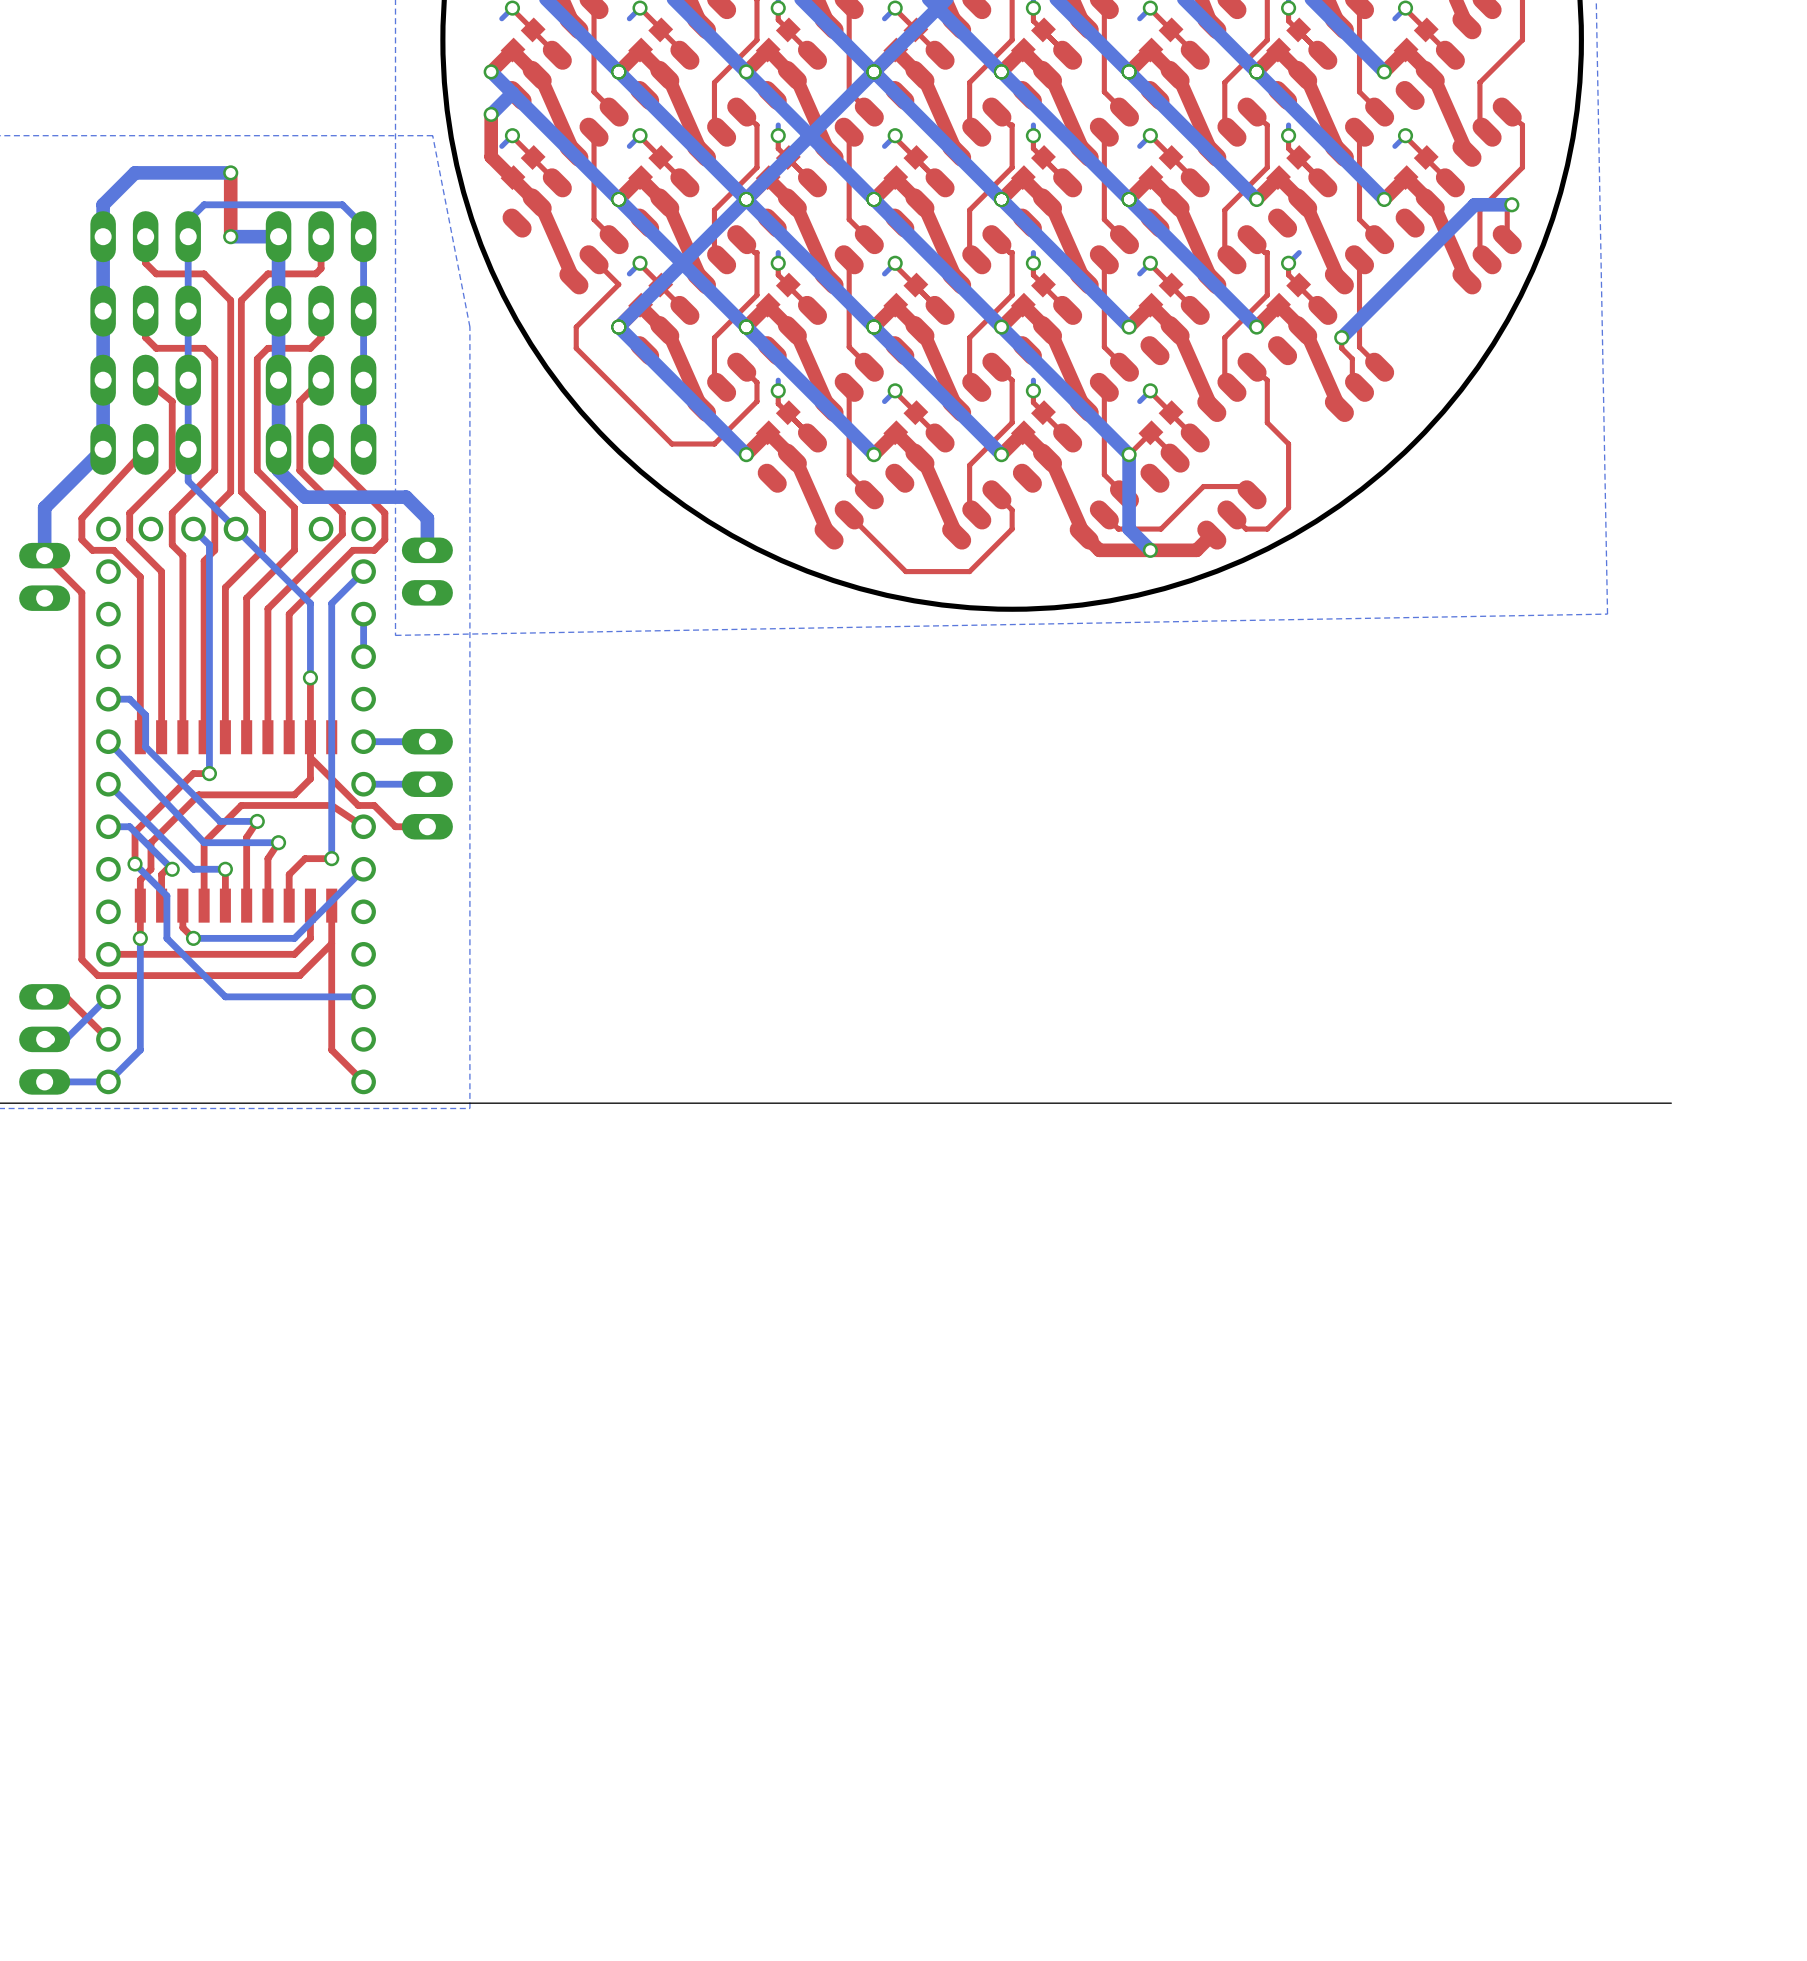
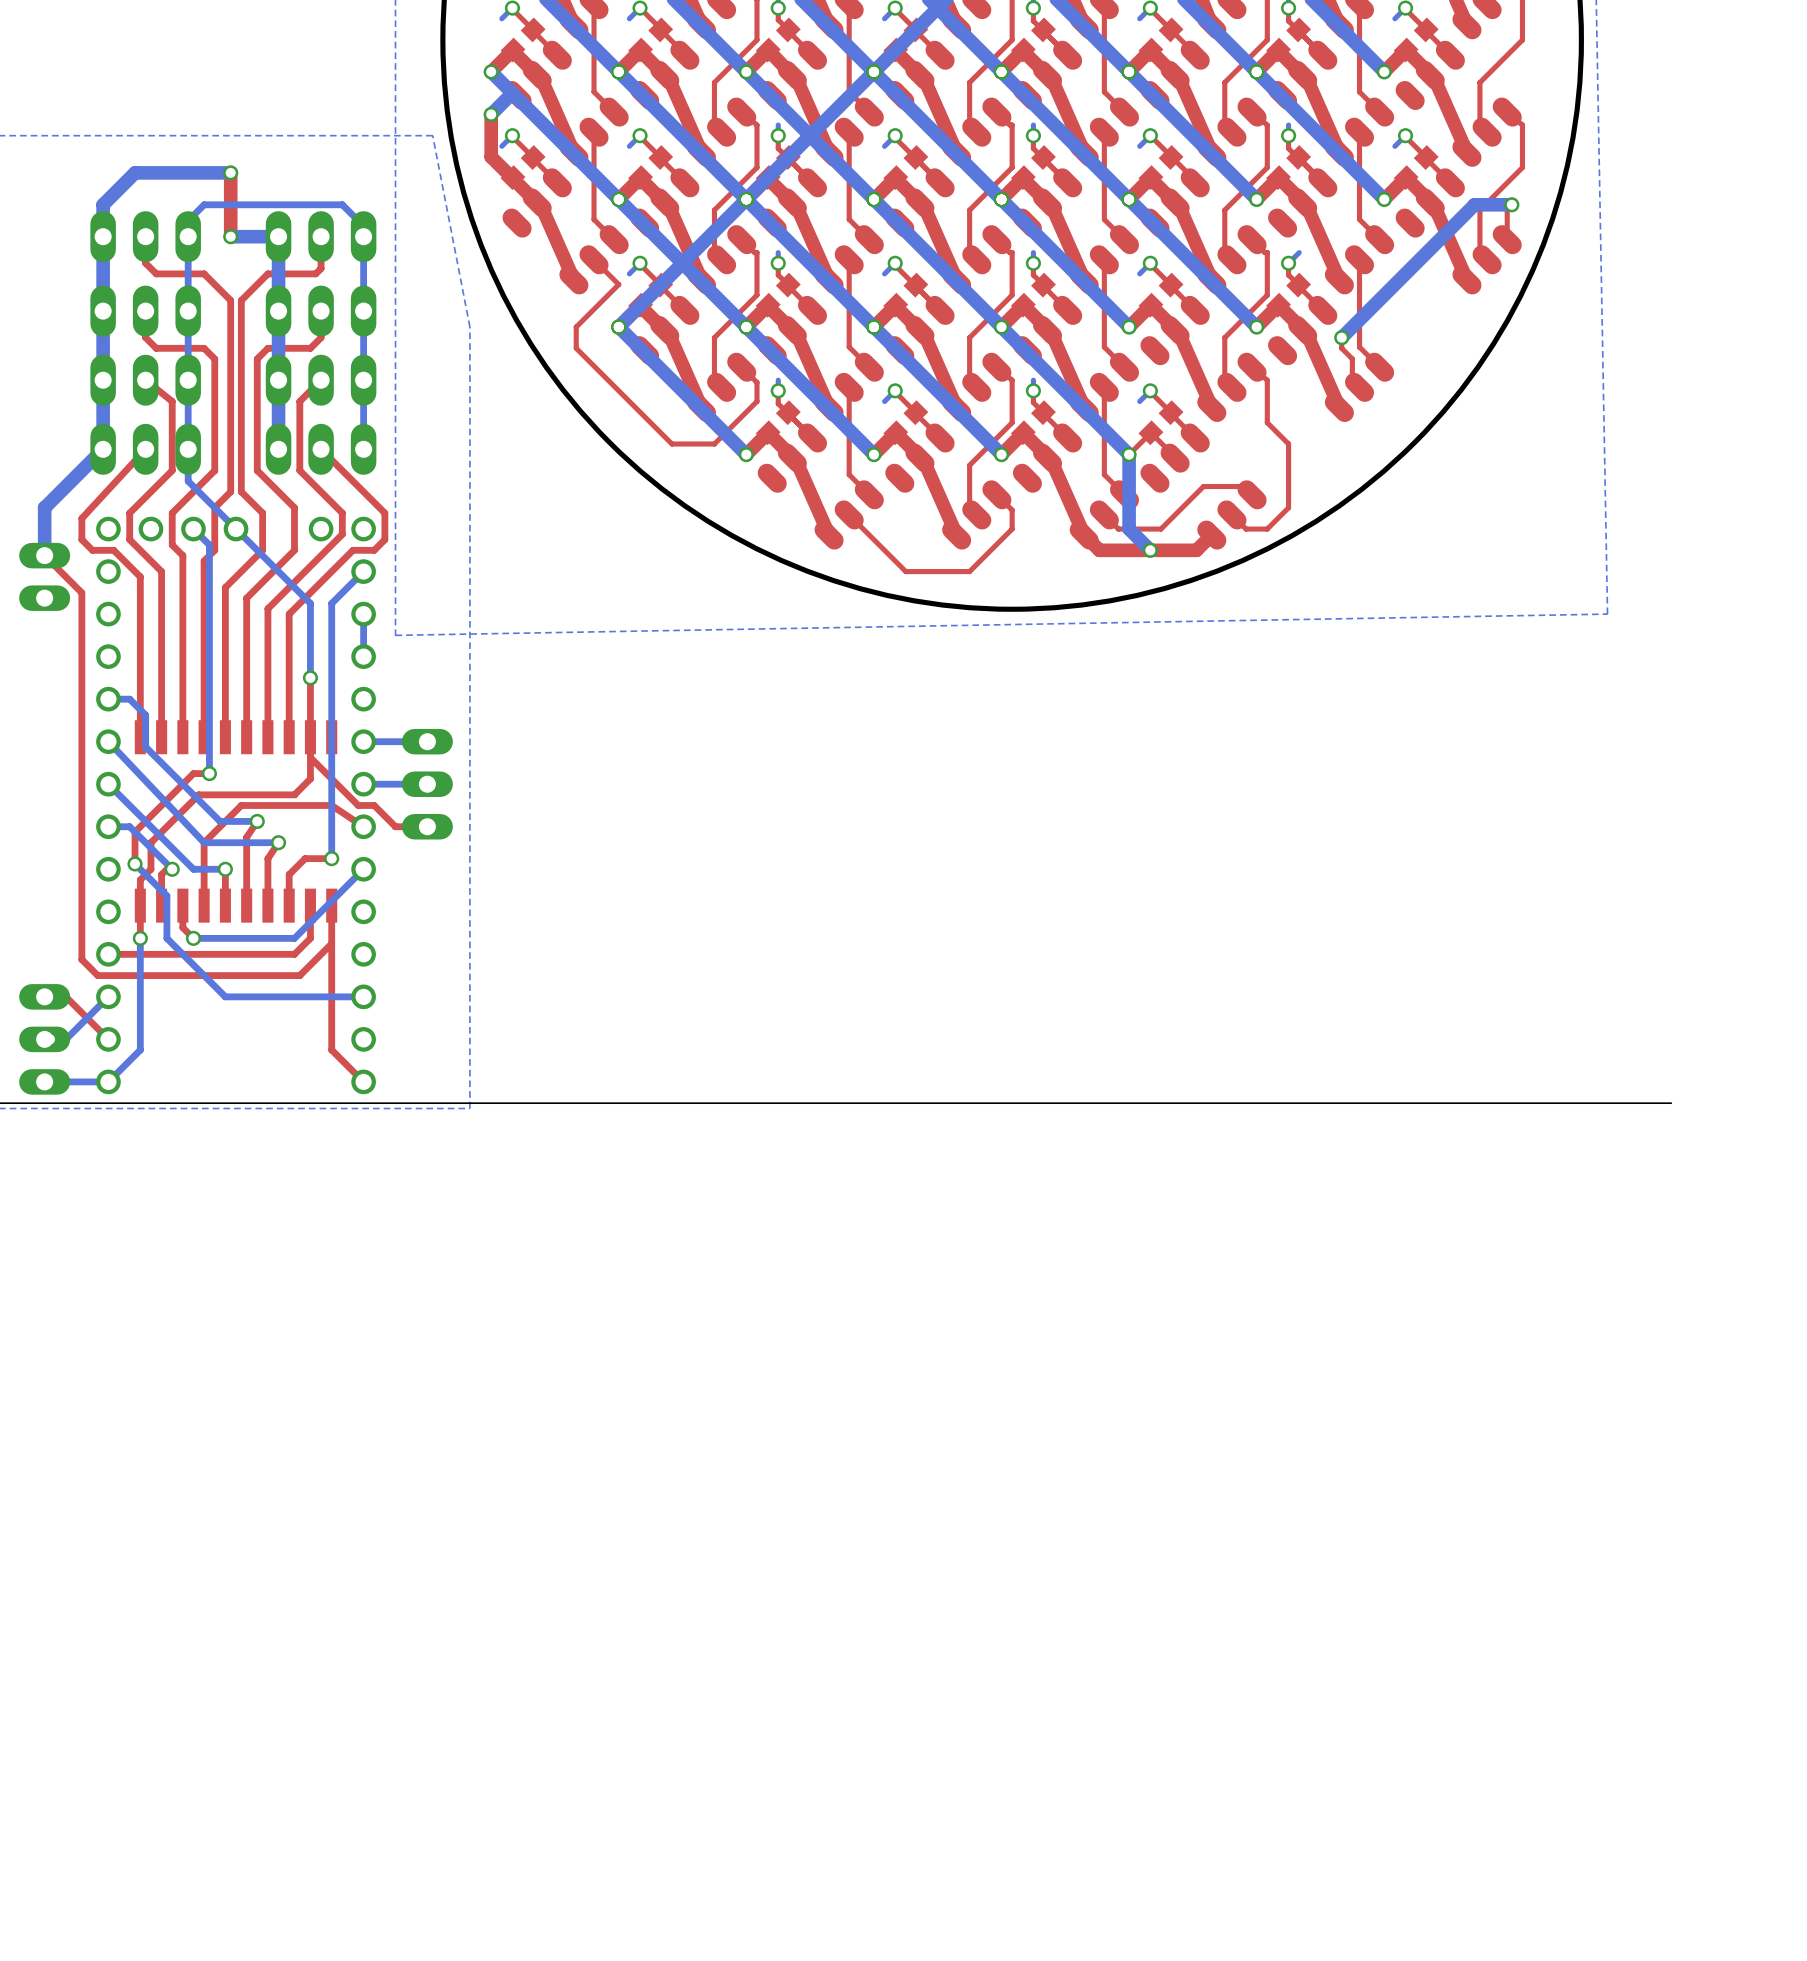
bottom track: (278, 449) (278, 470) (305, 497) (406, 497) (427, 518) (427, 550) -> none
part: (427, 571) -> none

